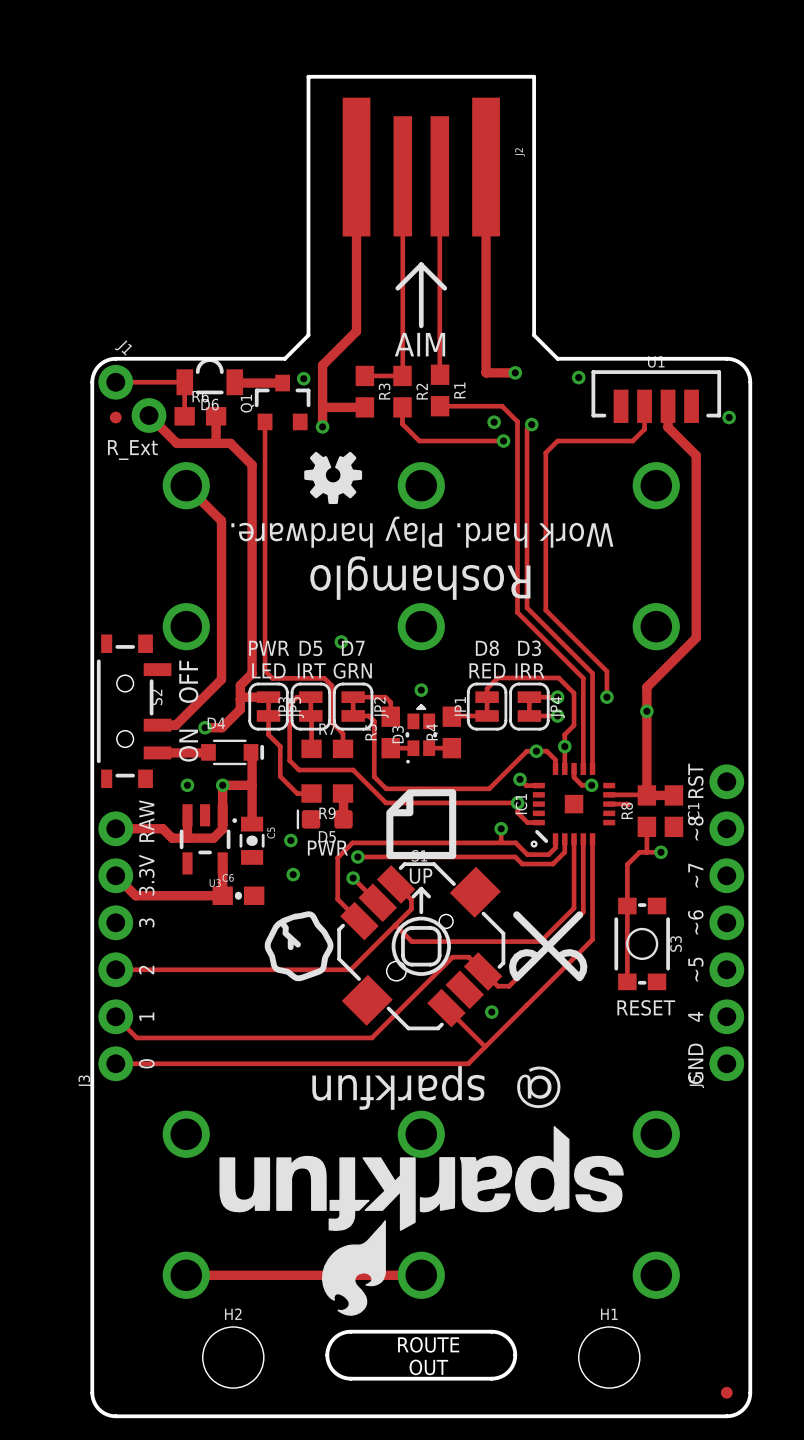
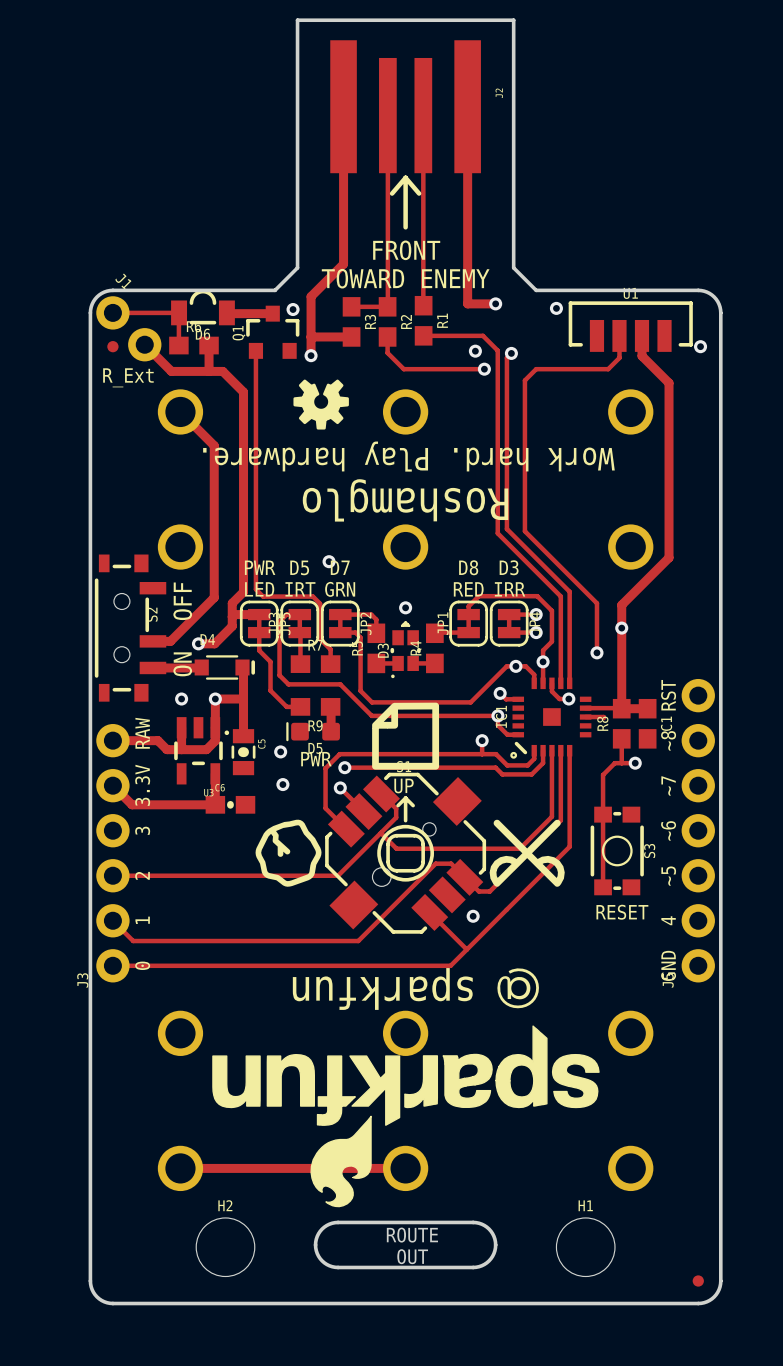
line: none -> (405, 177) (405, 200)
line: none -> (405, 177) (419, 193)
line: none -> (405, 177) (392, 193)
line: (397, 288) (421, 264) (444, 288) -> none
line: (421, 292) (421, 325) -> none
text: none -> FRONT (406, 250)
text: AIM (419, 344) -> TOWARD ENEMY (405, 278)
track: (606, 671) (606, 697) -> (583, 589) (596, 603) (596, 652)
via position: (606, 697) -> (596, 652)

